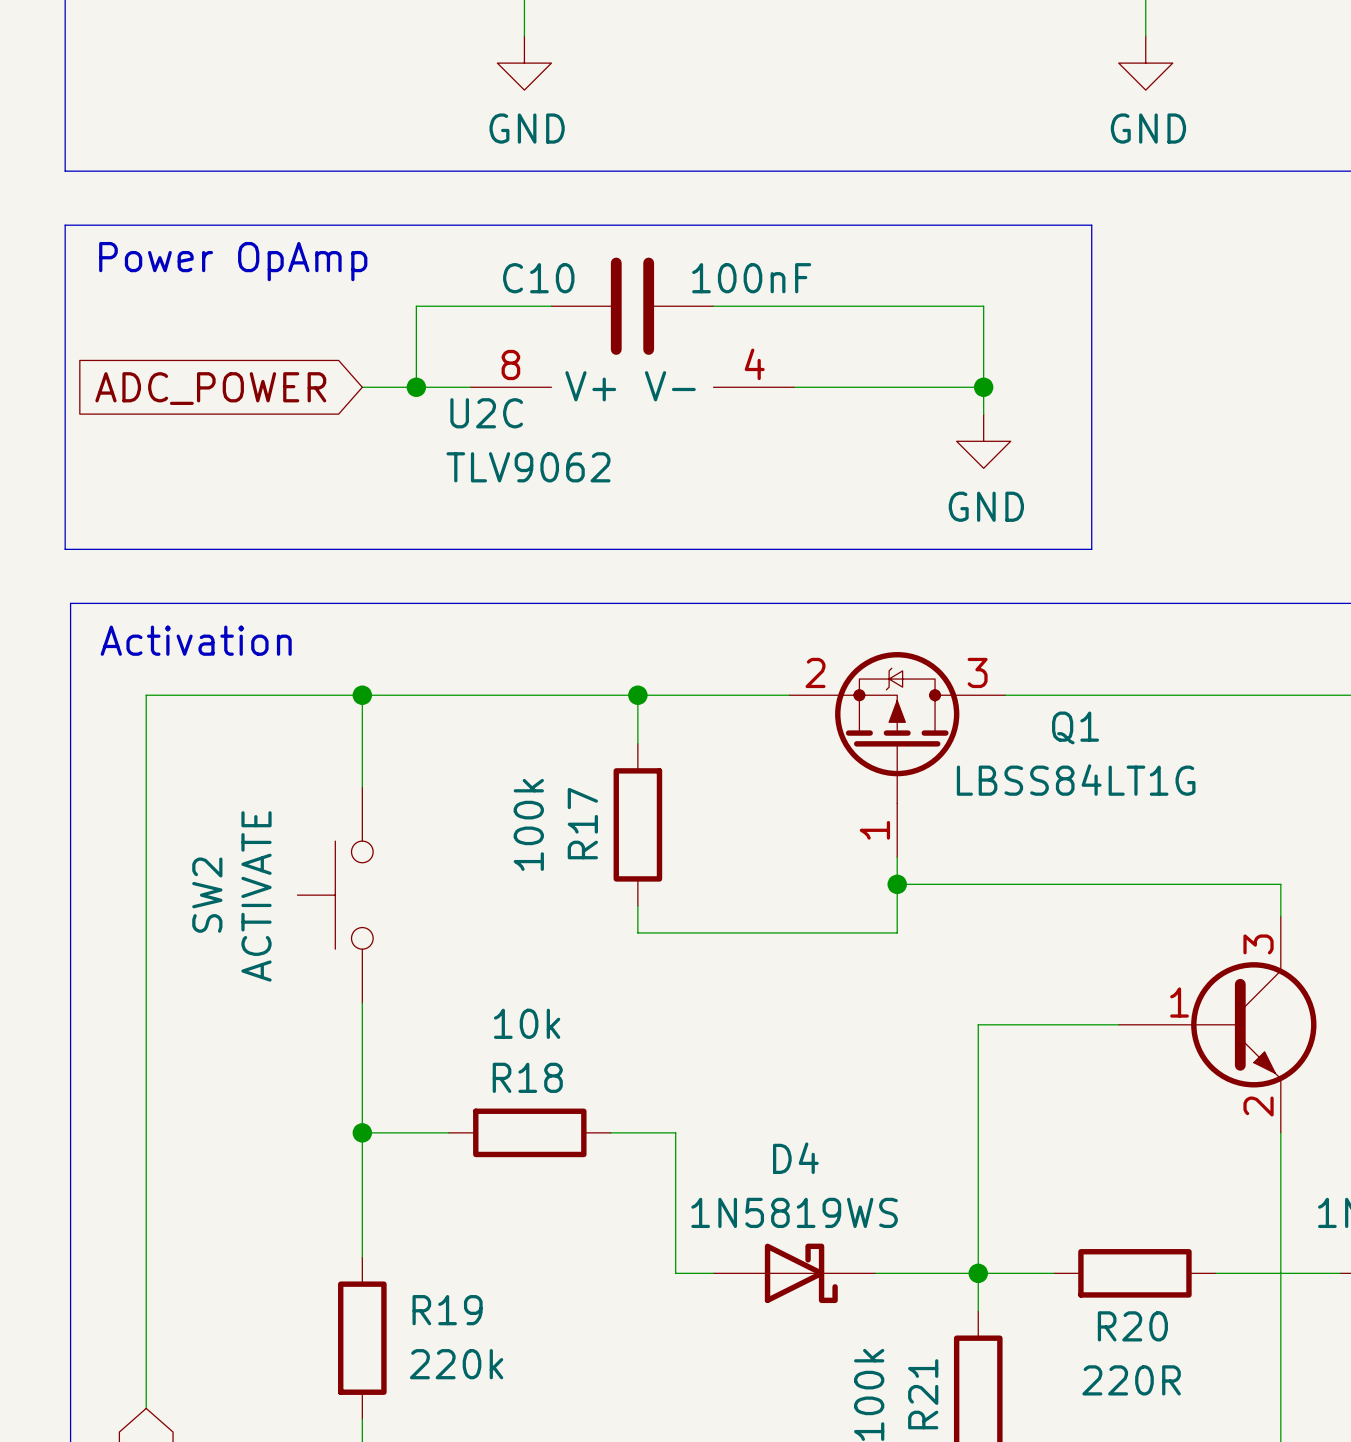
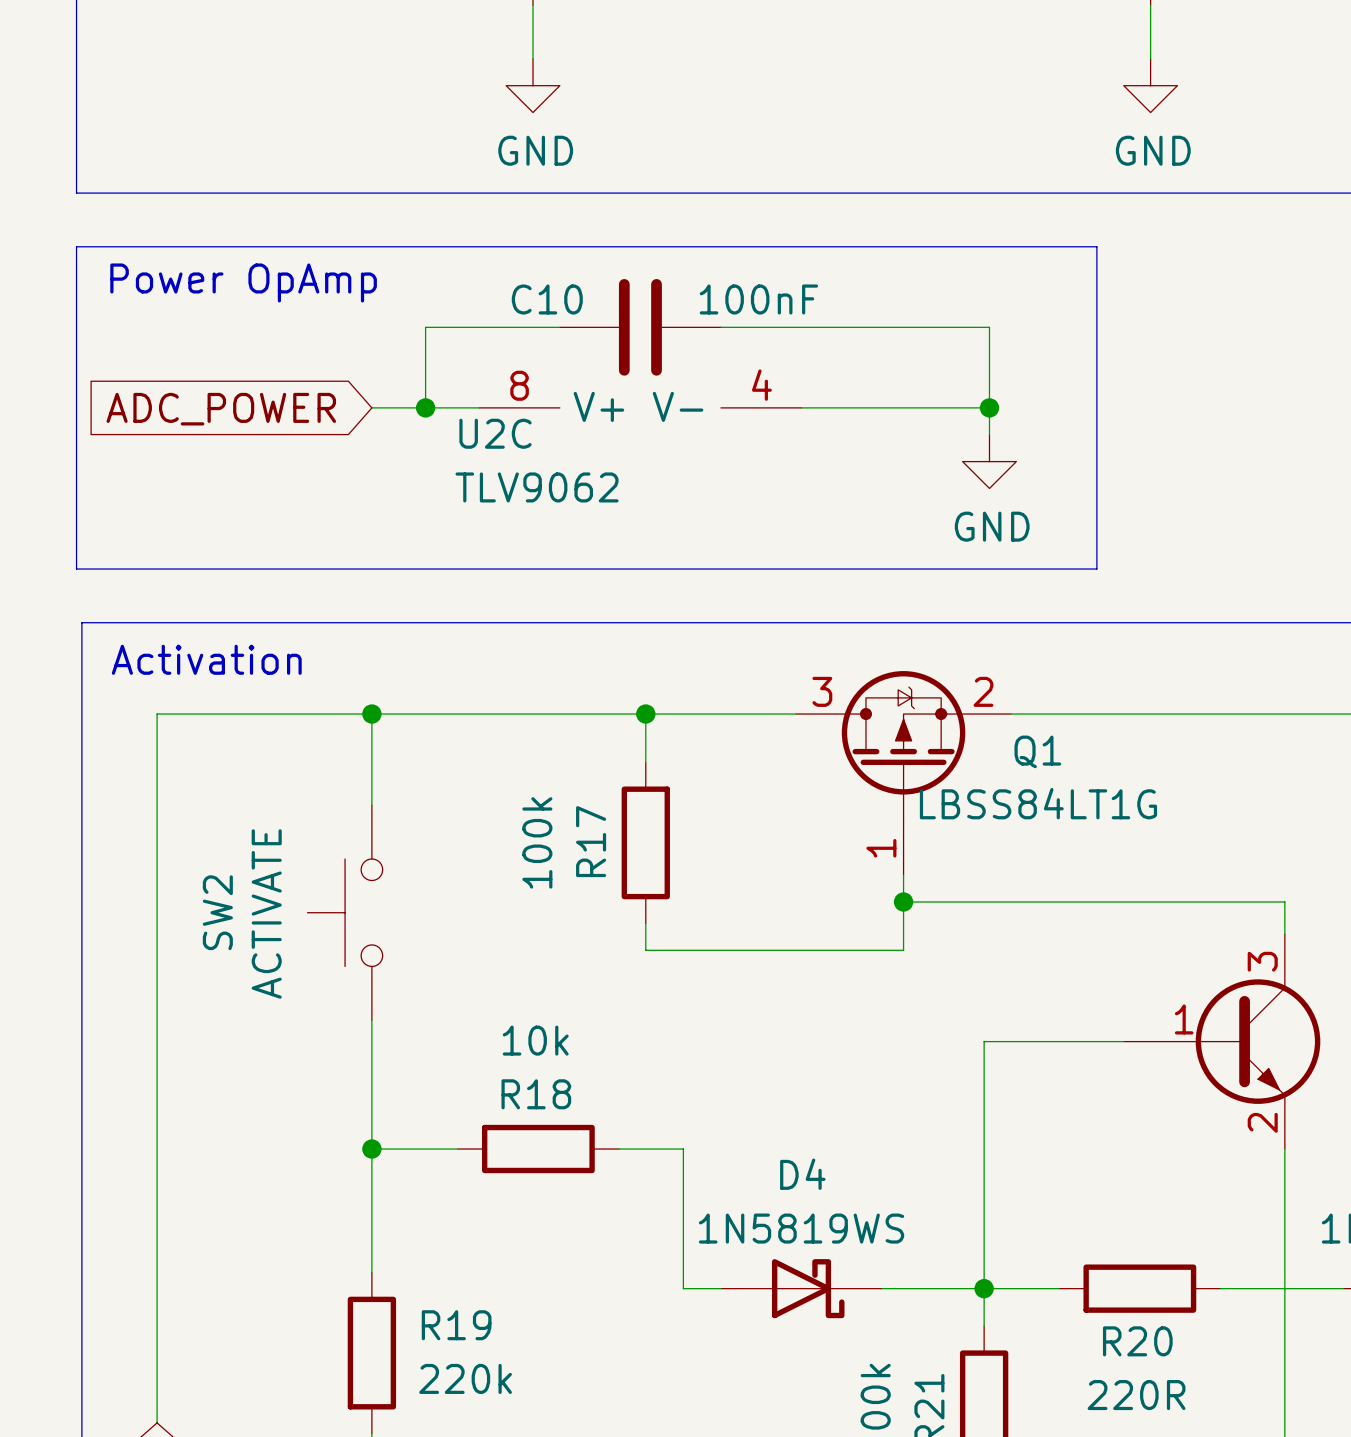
Q1 flip: as is (897, 727) -> left-right (903, 746)
Q1 name position: Q1 (1075, 727) -> Q1 (1037, 751)
Q1 value position: LBSS84LT1G (1076, 780) -> LBSS84LT1G (1038, 803)

